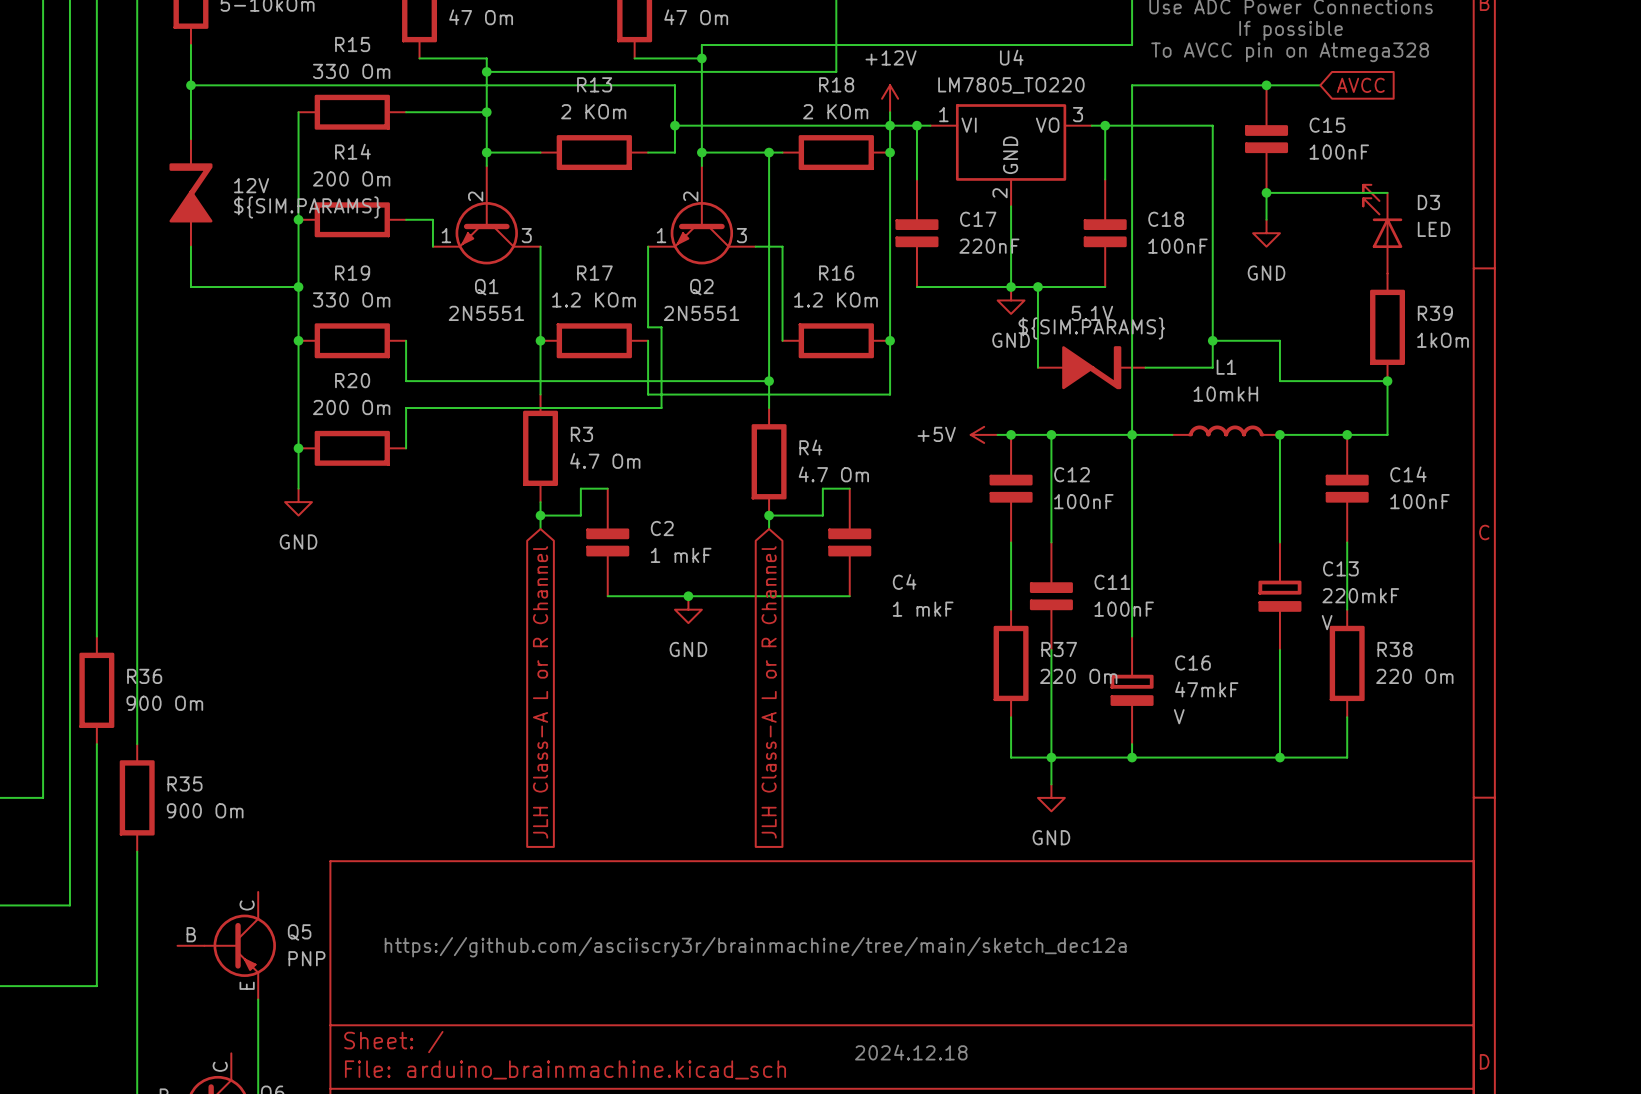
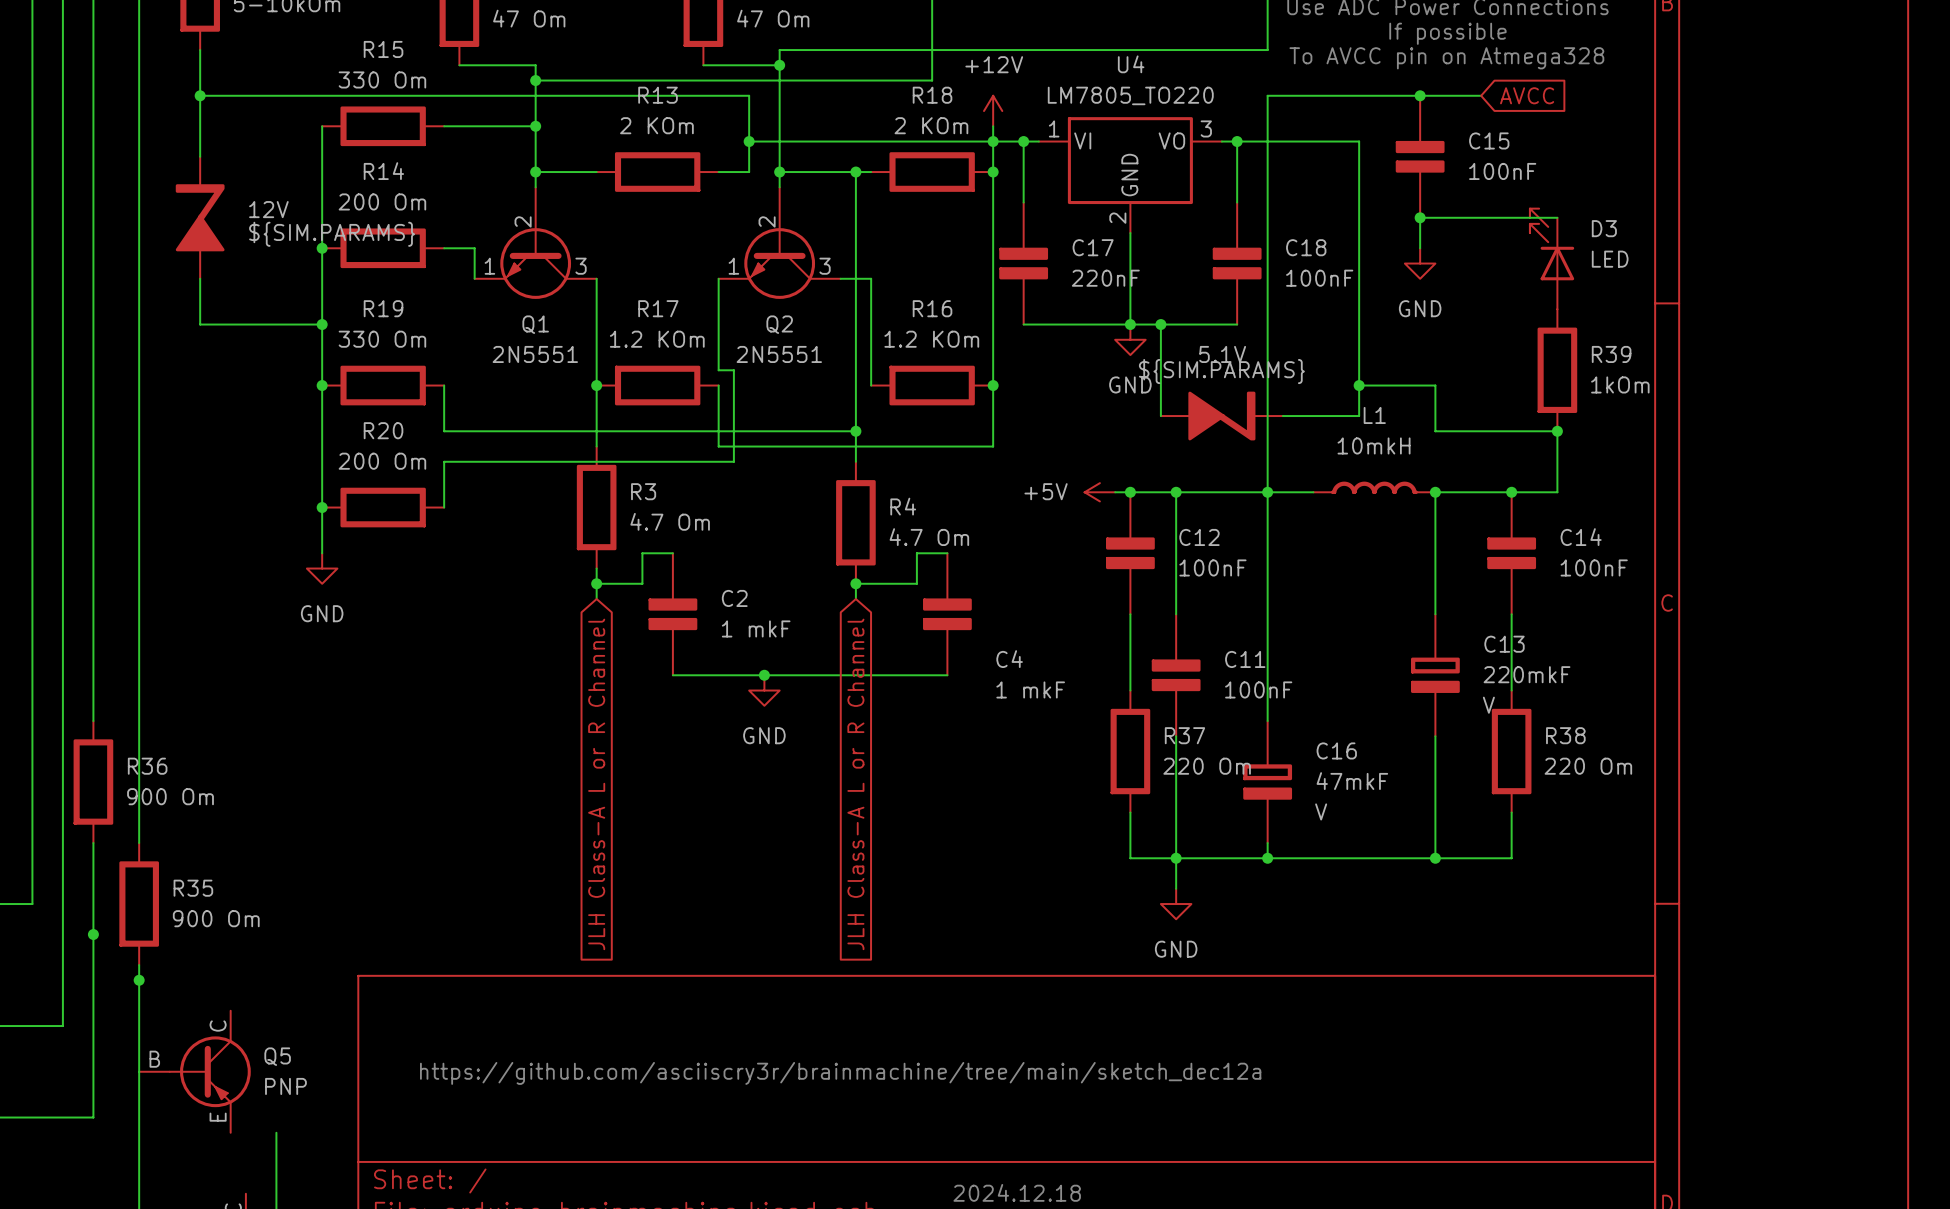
junction: none -> (93, 934)
junction: none -> (139, 980)
Q5 position: (226, 945) -> (194, 1071)

